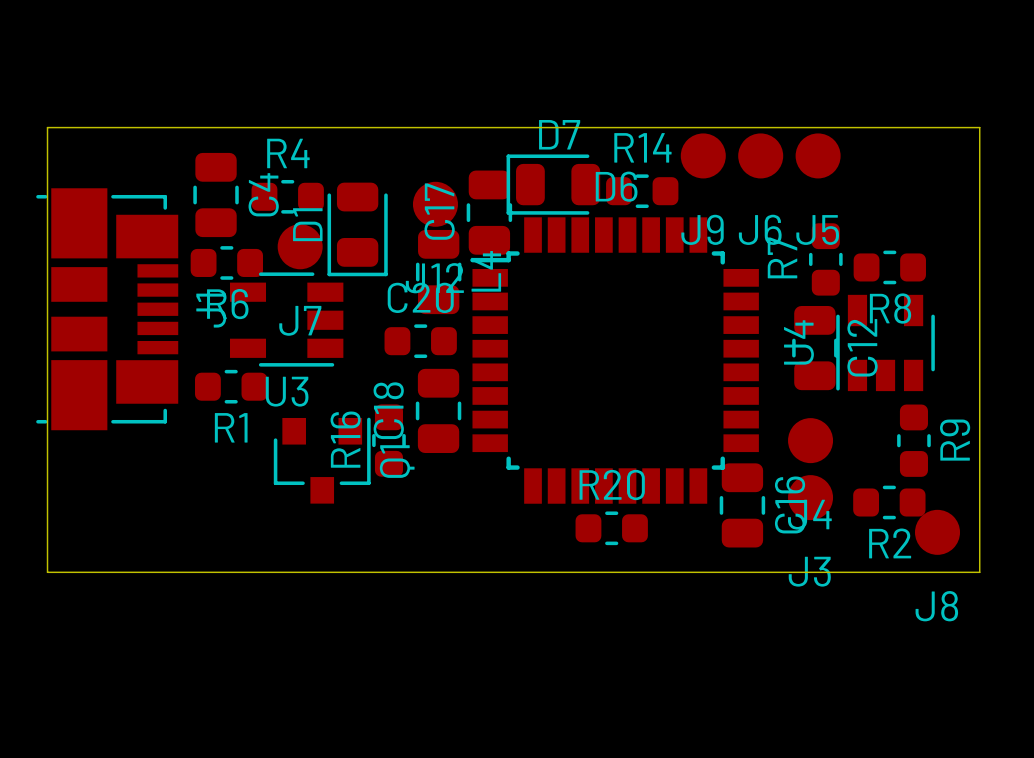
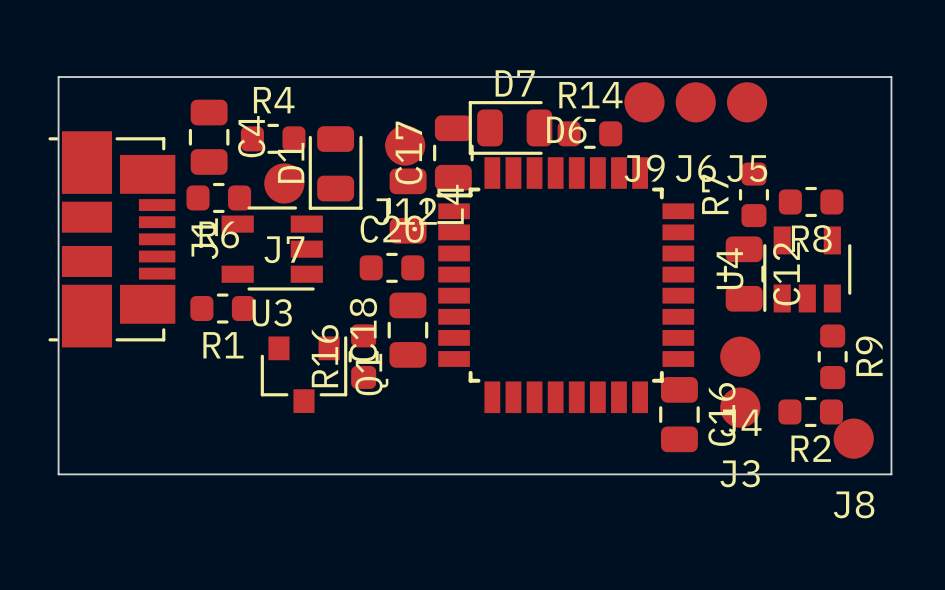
R20: (611, 528) -> none

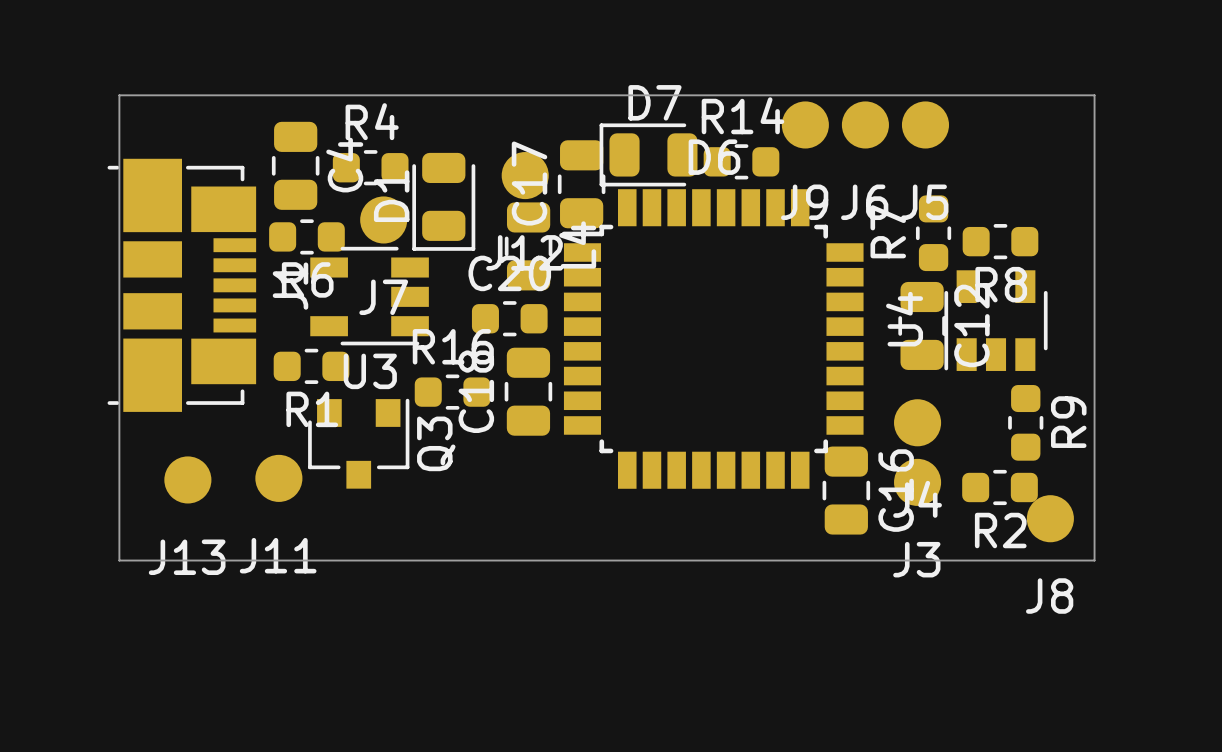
R16 rotation: 0° (363, 356) -> 90° clockwise (452, 392)
Q3: none -> (358, 443)
Q1: (304, 374) -> none
J11: none -> (278, 478)
J13: none -> (187, 479)

